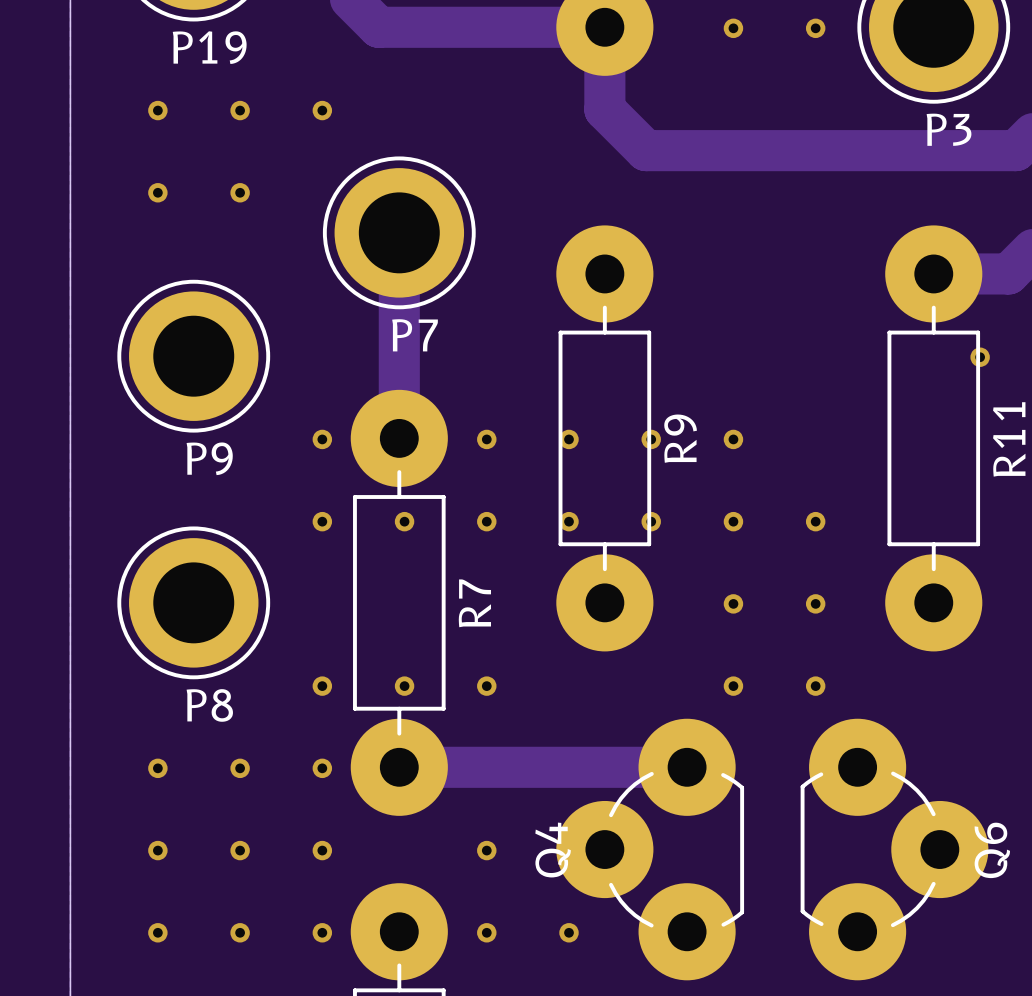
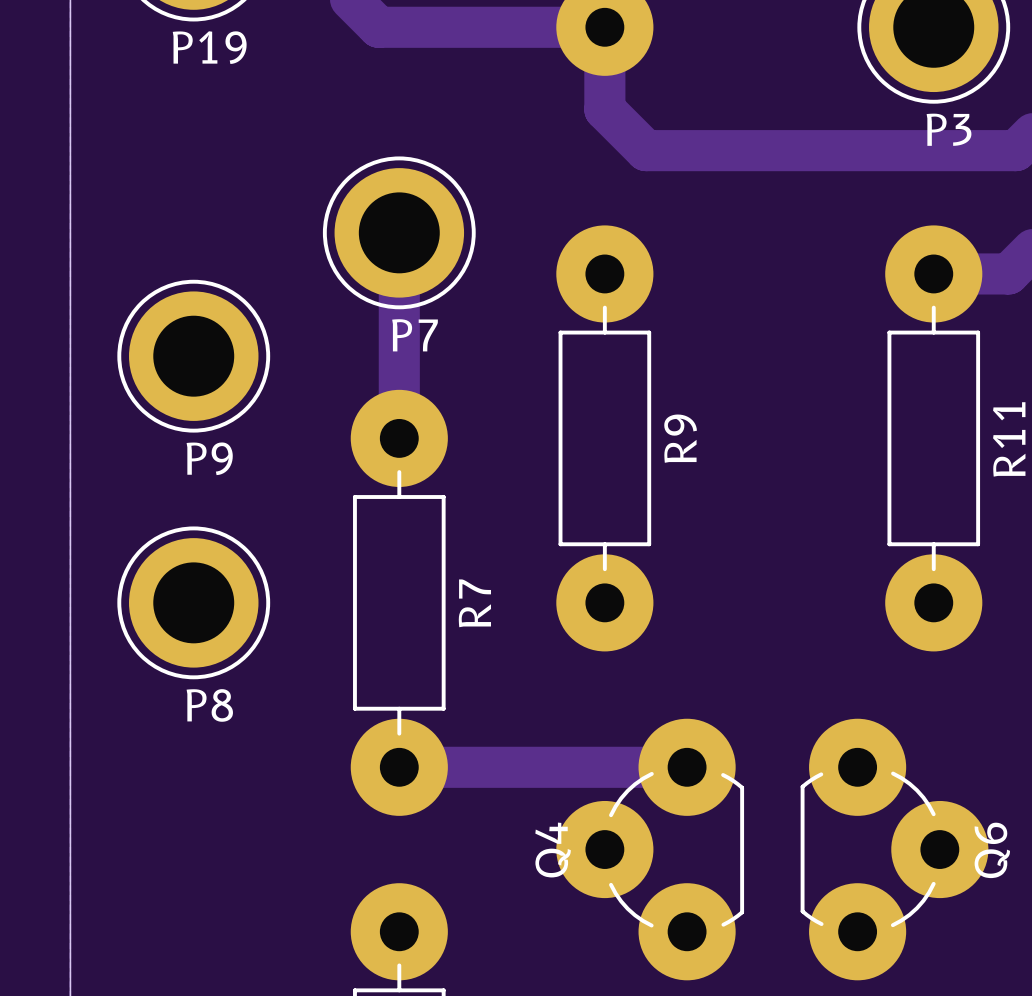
via: (733, 28) -> none
via: (815, 28) -> none
via: (157, 110) -> none
via: (240, 110) -> none
via: (322, 110) -> none
via: (157, 192) -> none
via: (240, 192) -> none
via: (980, 357) -> none
via: (322, 439) -> none
via: (486, 439) -> none
via: (569, 439) -> none
via: (651, 439) -> none
via: (733, 439) -> none
via: (322, 521) -> none
via: (404, 521) -> none
via: (486, 521) -> none
via: (569, 521) -> none
via: (651, 521) -> none
via: (733, 521) -> none
via: (815, 521) -> none
via: (733, 603) -> none
via: (815, 603) -> none
via: (322, 686) -> none
via: (404, 686) -> none
via: (486, 686) -> none
via: (733, 686) -> none
via: (815, 686) -> none
via: (157, 768) -> none
via: (240, 768) -> none
via: (322, 768) -> none
via: (157, 850) -> none
via: (240, 850) -> none
via: (322, 850) -> none
via: (486, 850) -> none
via: (157, 932) -> none
via: (240, 932) -> none
via: (322, 932) -> none
via: (486, 932) -> none
via: (569, 932) -> none

